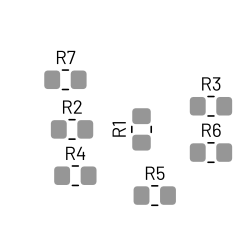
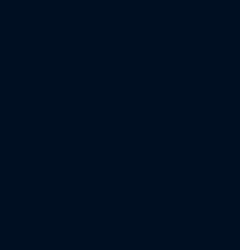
R7: (65, 79) -> none
R3: (210, 106) -> none
R2: (72, 129) -> none
R1: (141, 129) -> none
R6: (210, 152) -> none
R4: (75, 175) -> none
R5: (154, 195) -> none

